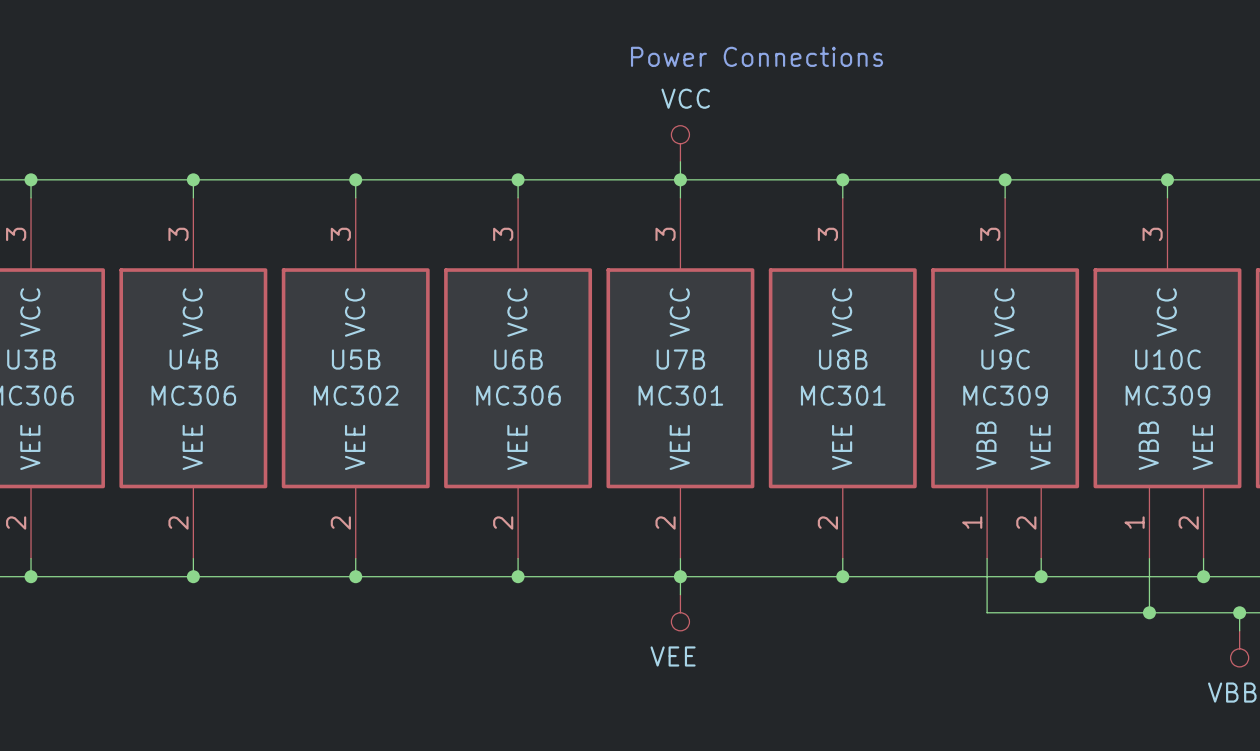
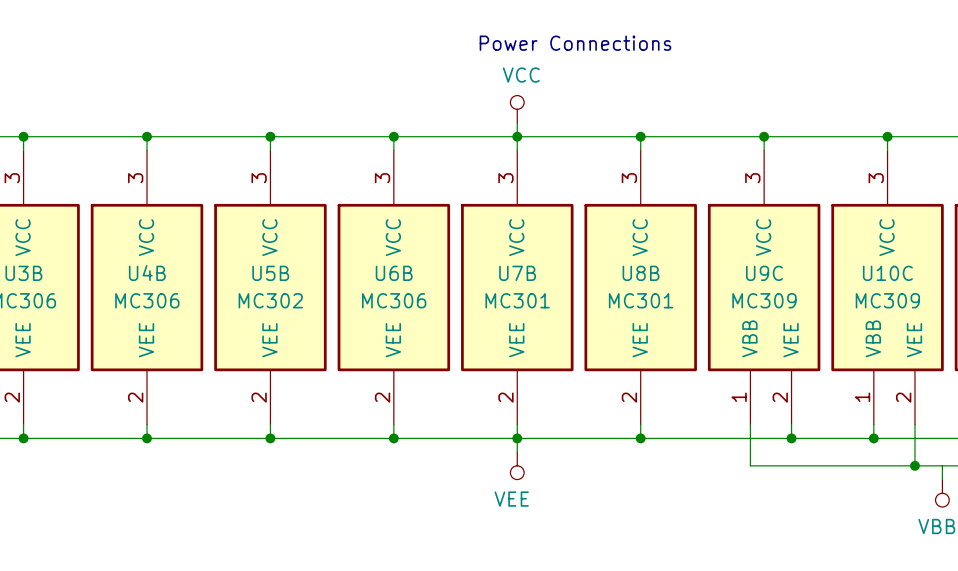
wire: (1149, 576) (1149, 612) -> (914, 438) (914, 465)
junction: none -> (873, 438)
junction: (1203, 576) -> none
junction: (1149, 612) -> none
junction: none -> (914, 465)
junction: (1239, 612) -> none

